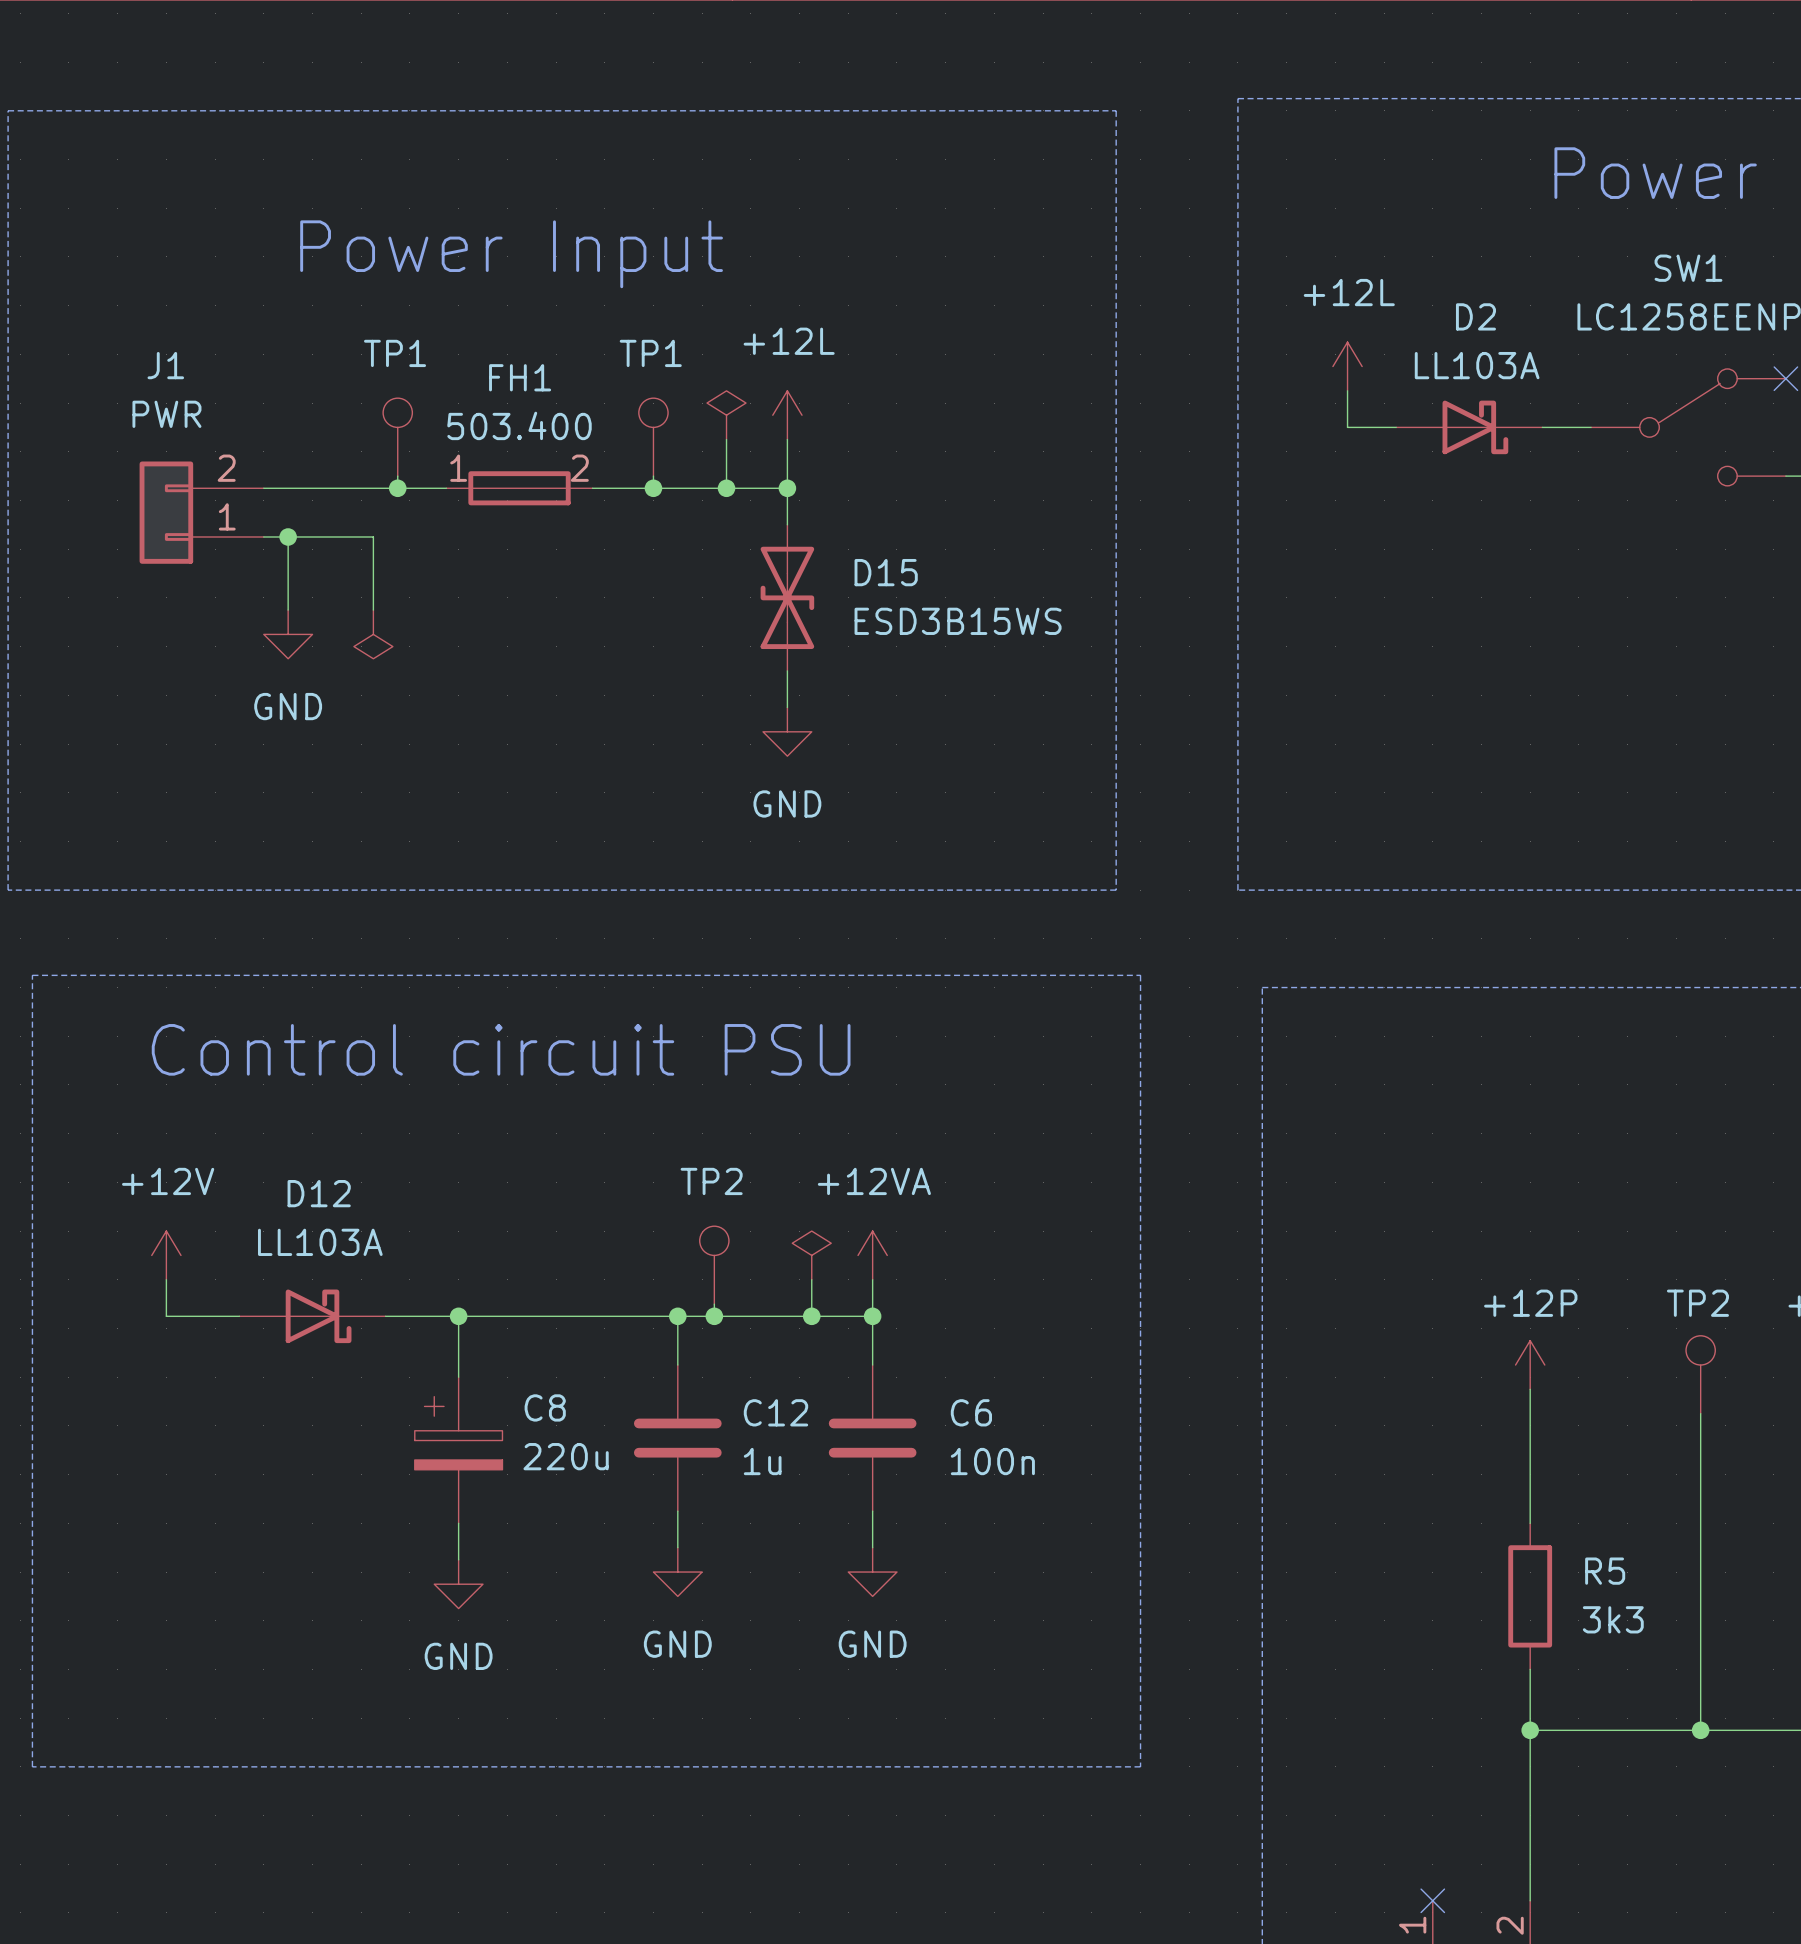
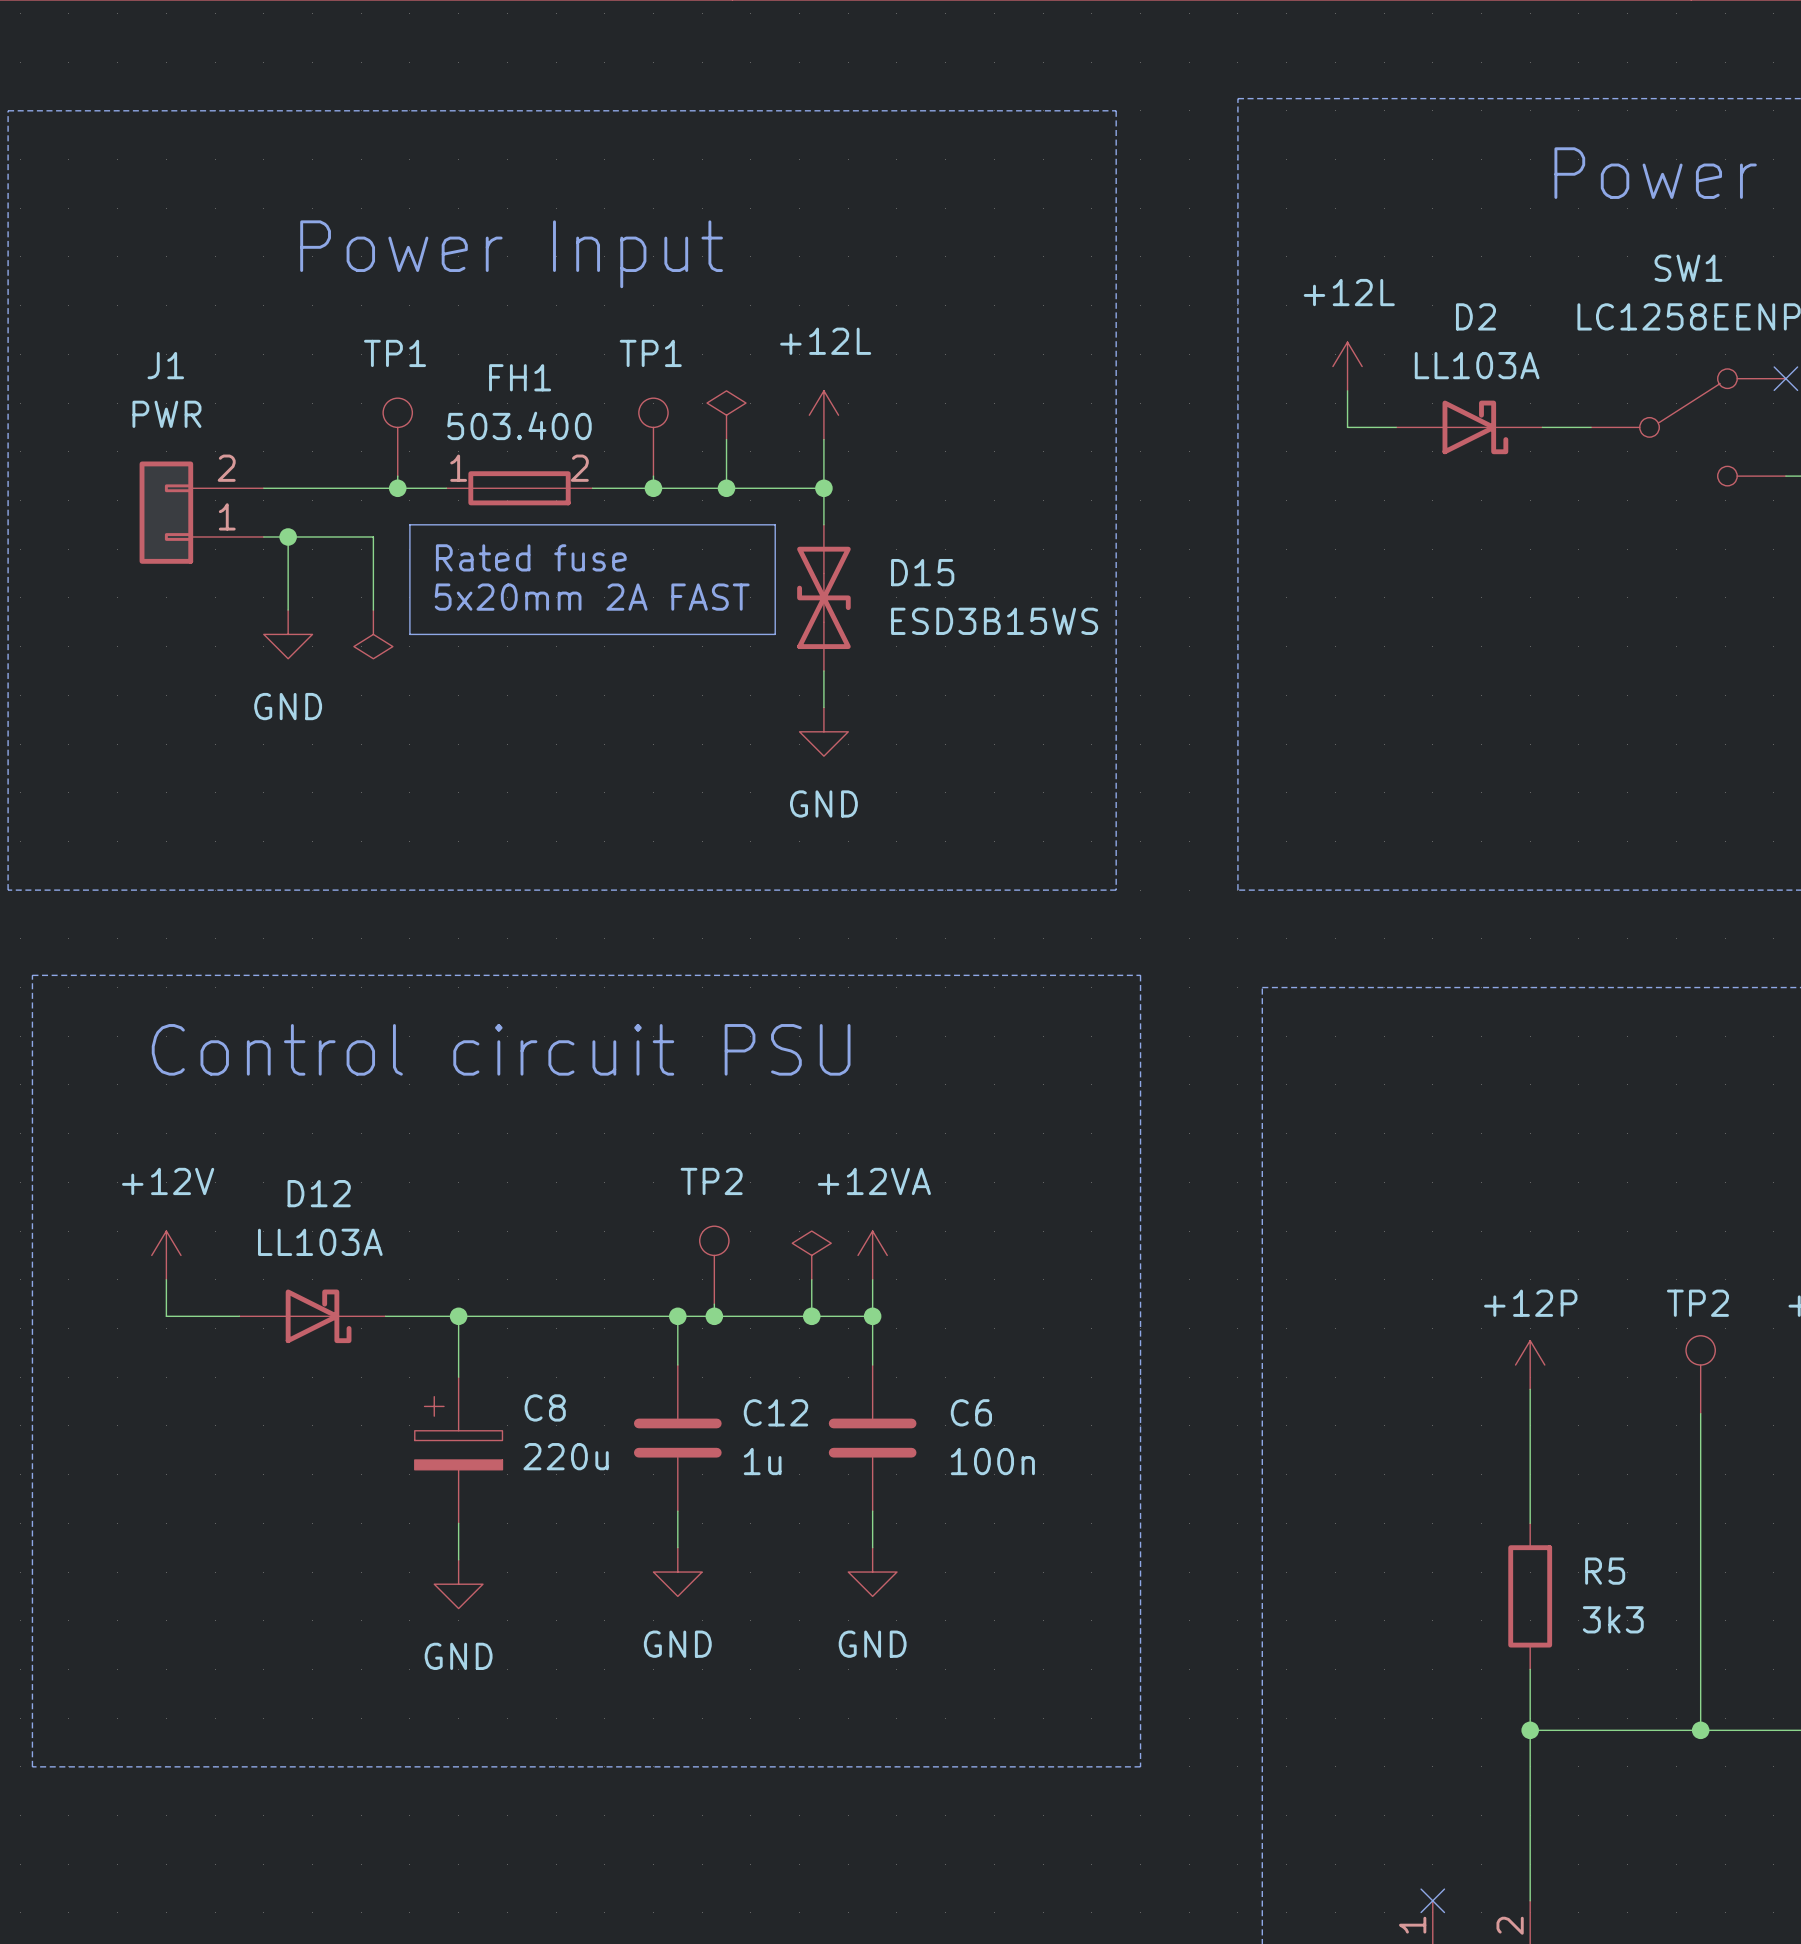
power symbol position: +12L (787, 415) -> +12L (823, 415)
wire: (787, 439) (787, 524) -> (823, 439) (823, 524)
wire: none -> (787, 488) (823, 488)
junction position: (787, 488) -> (823, 488)
line: none -> (409, 524) (775, 524) (775, 634) (409, 634) (409, 524)
text: none -> Rated fuse (531, 557)
text: none -> 5x20mm 2A FAST (592, 597)
D15 position: (787, 597) -> (823, 597)
wire: (787, 670) (787, 707) -> (823, 670) (823, 707)
power symbol position: GND (787, 731) -> GND (823, 731)

